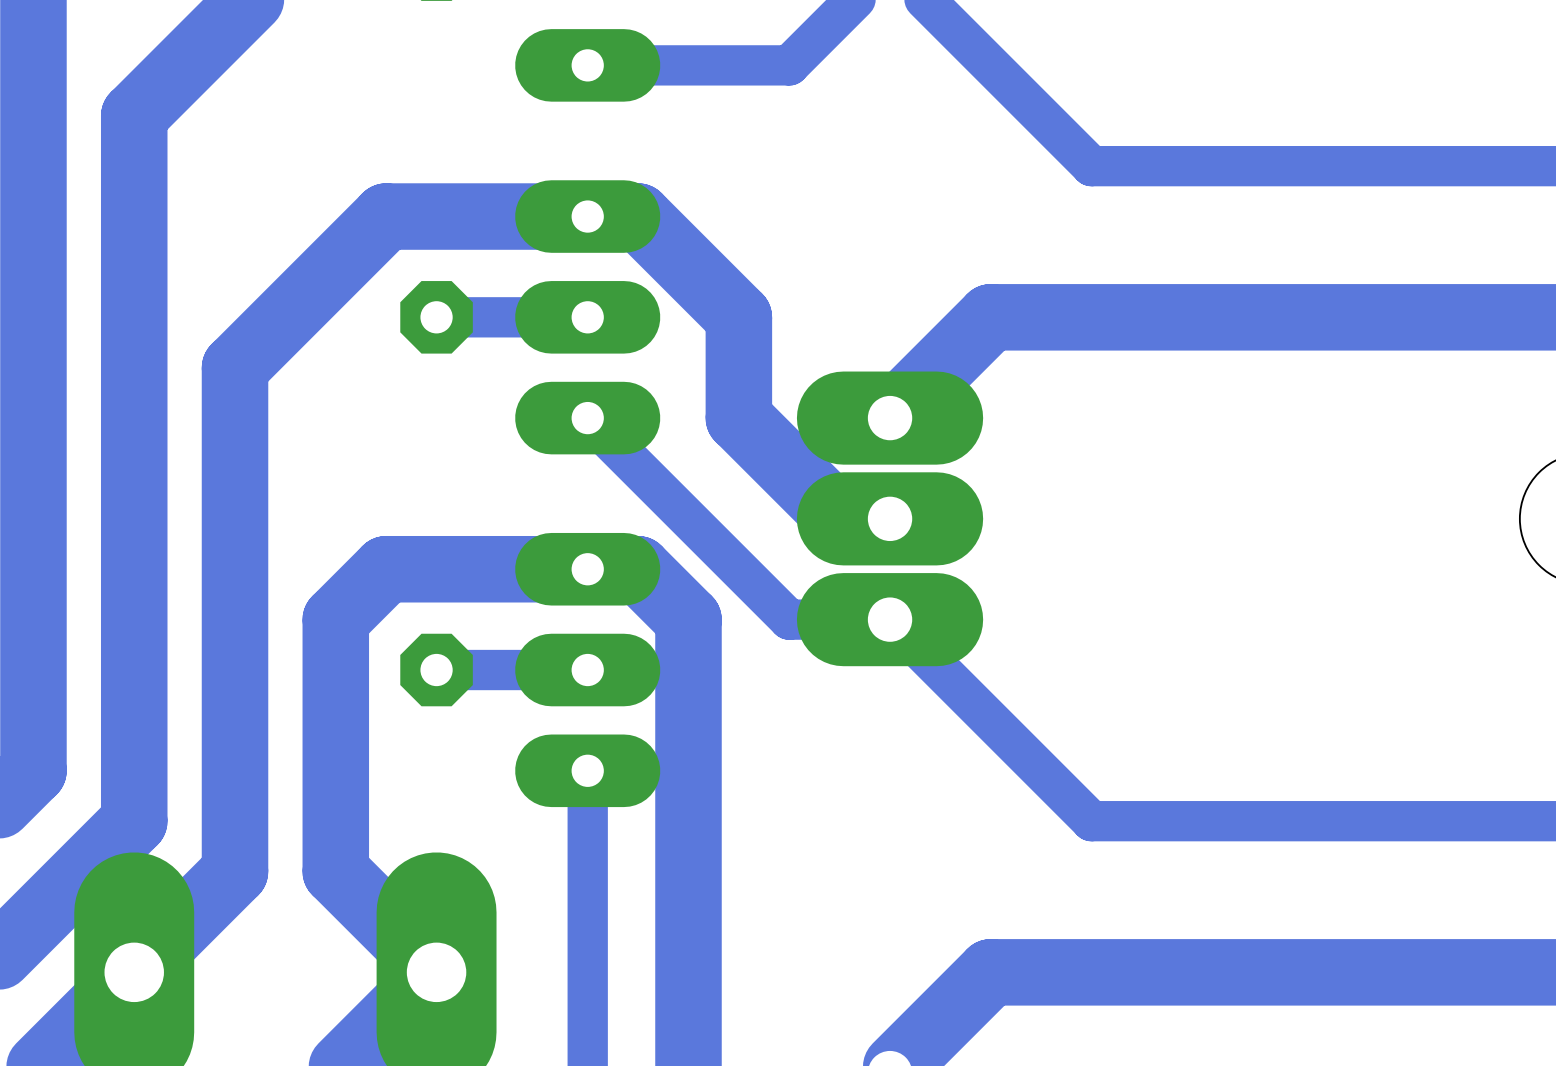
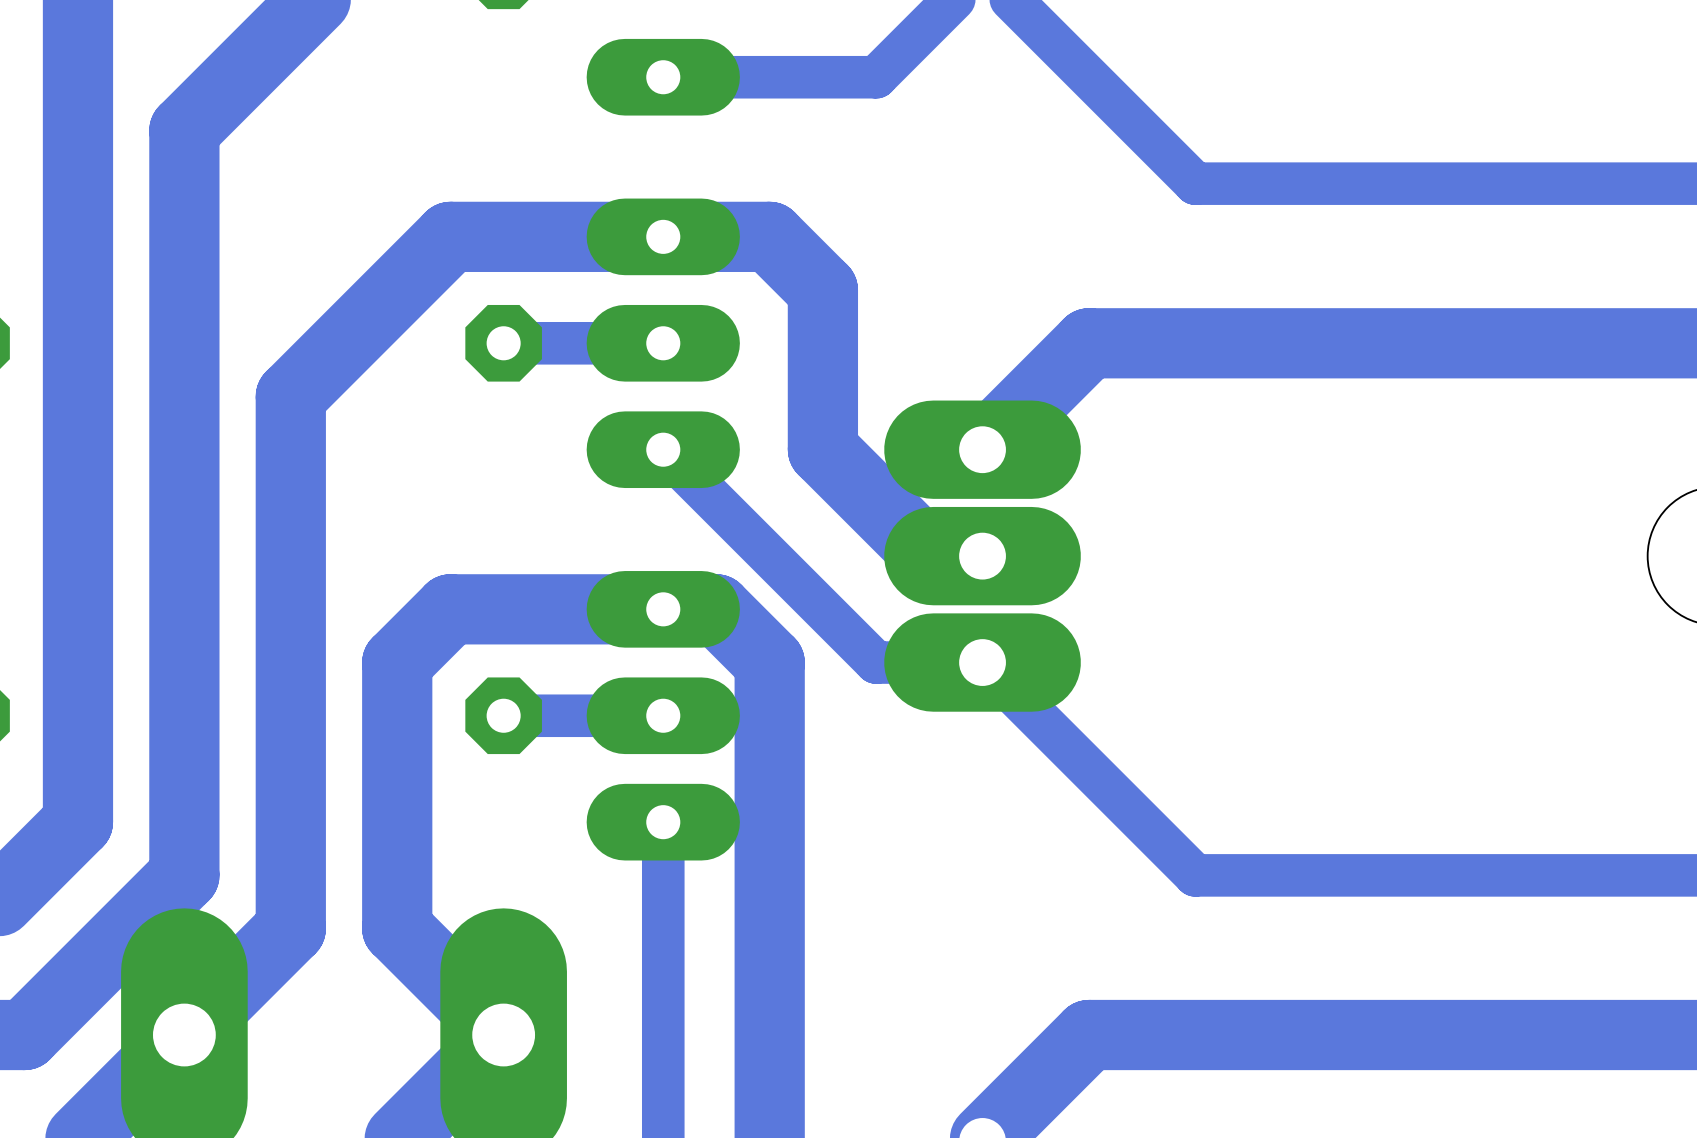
track: (638, 216) (738, 317) -> (716, 236) (769, 236) (822, 290) (822, 343)

